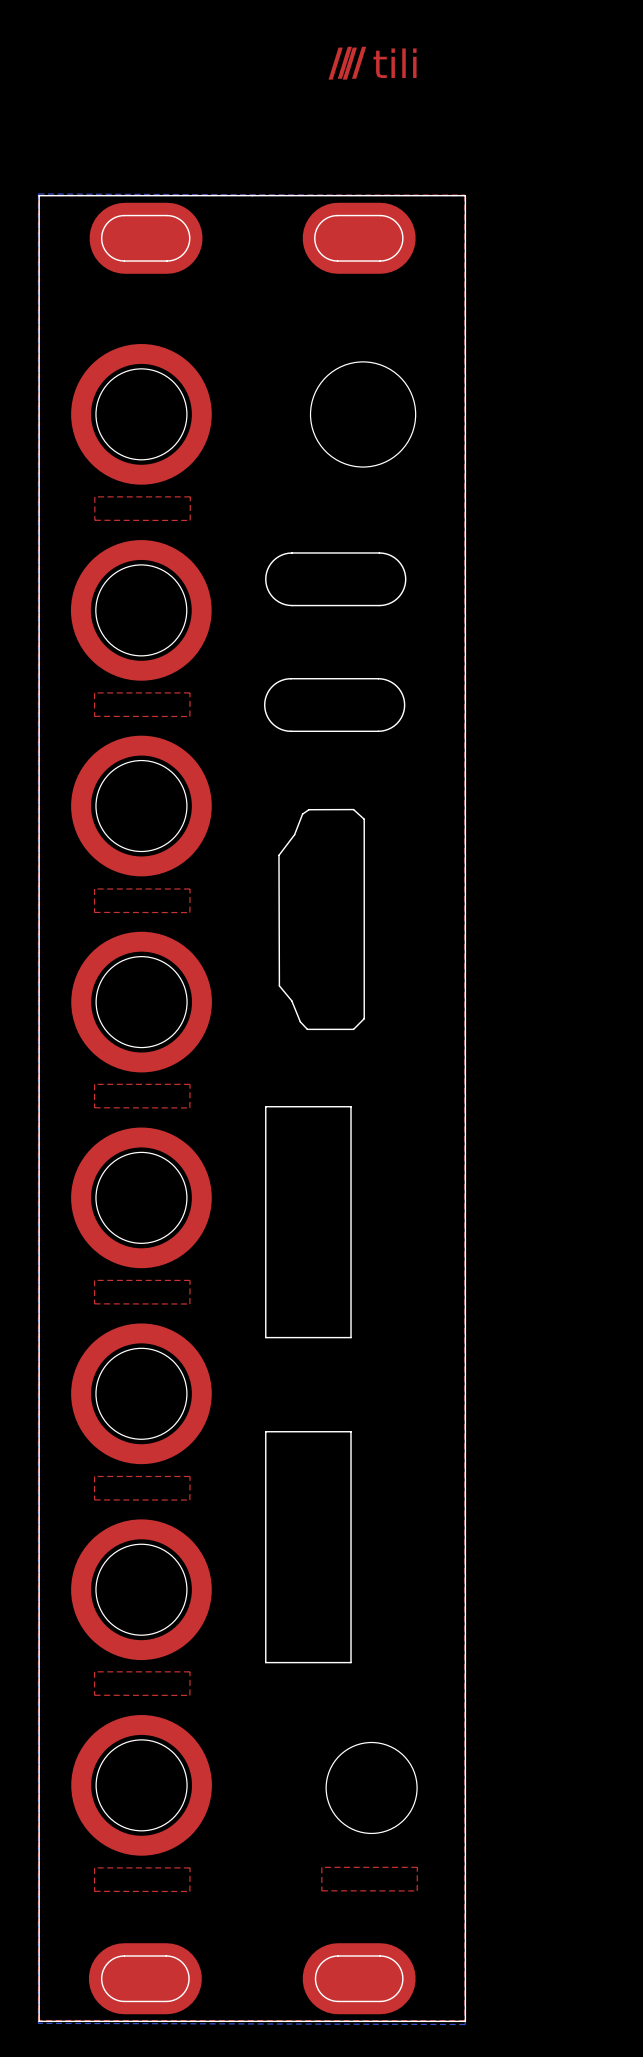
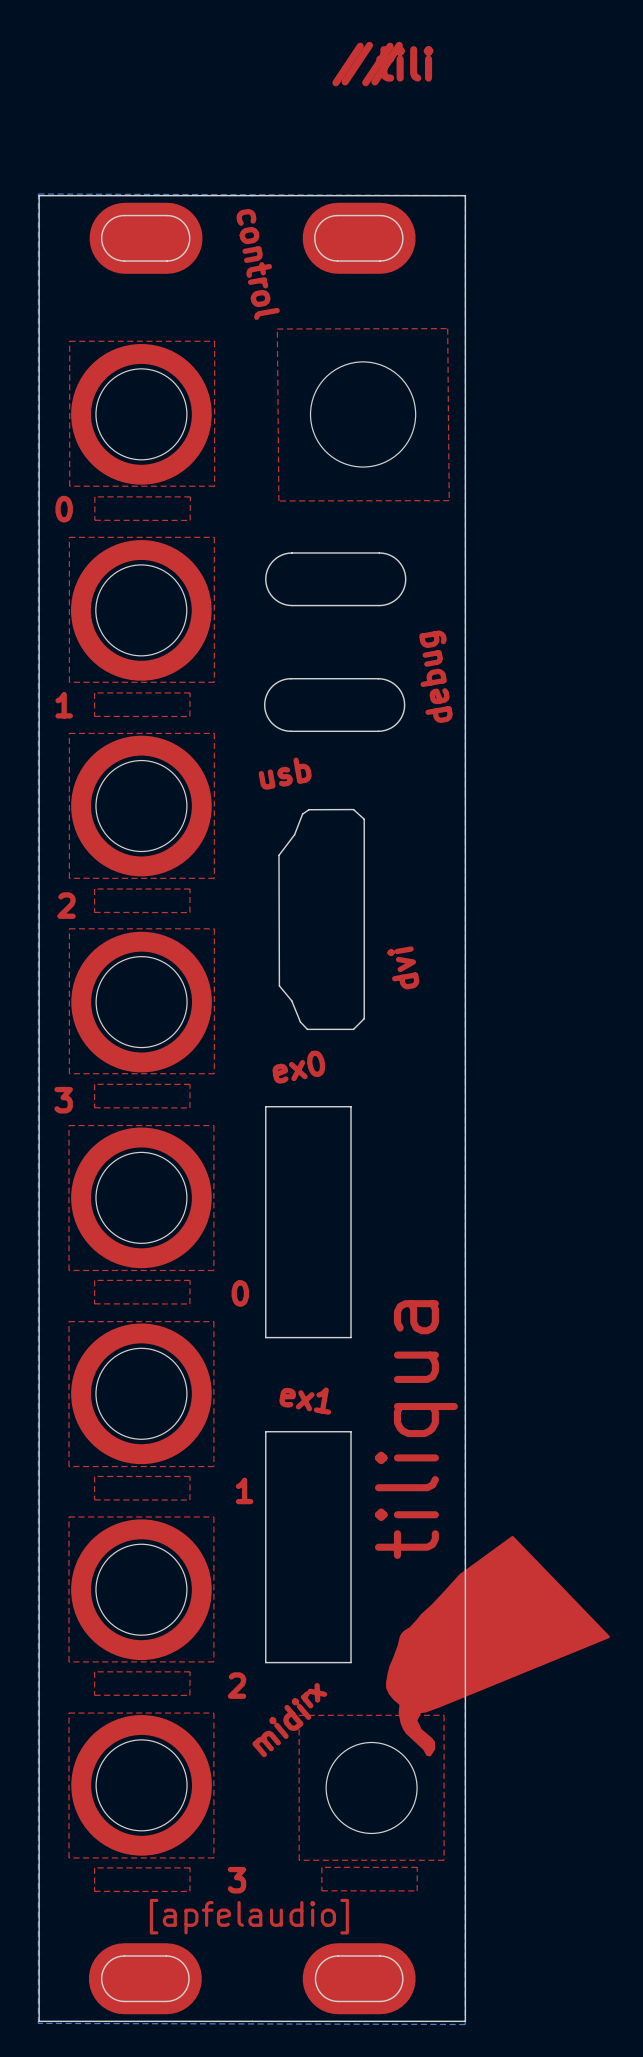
top zone outline: (464, 195) (38, 195) (38, 2020) (464, 2020) (464, 195) -> none
text: none -> control (258, 264)
top zone outline: none -> (447, 328) (277, 329) (278, 500) (449, 500) (447, 328)
top zone outline: none -> (69, 341) (214, 341) (214, 486) (69, 486) (69, 341)
text: none -> 0 (64, 509)
top zone outline: none -> (69, 537) (69, 682) (214, 682) (214, 537) (69, 537)
text: none -> debug (436, 676)
text: none -> 1 (64, 705)
top zone outline: none -> (69, 733) (69, 878) (214, 878) (214, 733) (69, 733)
text: none -> usb (285, 773)
text: none -> 2 (66, 905)
top zone outline: none -> (69, 928) (214, 928) (214, 1073) (69, 1073) (69, 928)
text: none -> dvi (403, 967)
text: none -> ex0 (298, 1067)
text: none -> 3 (63, 1100)
top zone outline: none -> (68, 1125) (68, 1270) (213, 1270) (213, 1125) (68, 1125)
text: none -> 0 (240, 1293)
top zone outline: none -> (68, 1321) (68, 1466) (213, 1466) (213, 1321) (68, 1321)
text: none -> ex1 (305, 1401)
text: none -> tiliqua (416, 1429)
text: none -> 1 (244, 1490)
top zone outline: none -> (68, 1516) (213, 1516) (213, 1661) (68, 1661) (68, 1516)
drawing: none -> [386, 1535, 610, 1757]
text: none -> 2 (236, 1685)
top zone outline: none -> (68, 1713) (68, 1857) (213, 1857) (213, 1713) (68, 1713)
top zone outline: none -> (299, 1715) (444, 1715) (444, 1860) (299, 1860) (299, 1715)
text: none -> midirx (289, 1720)
text: none -> 3 (236, 1880)
text: none -> [apfelaudio] (249, 1916)

